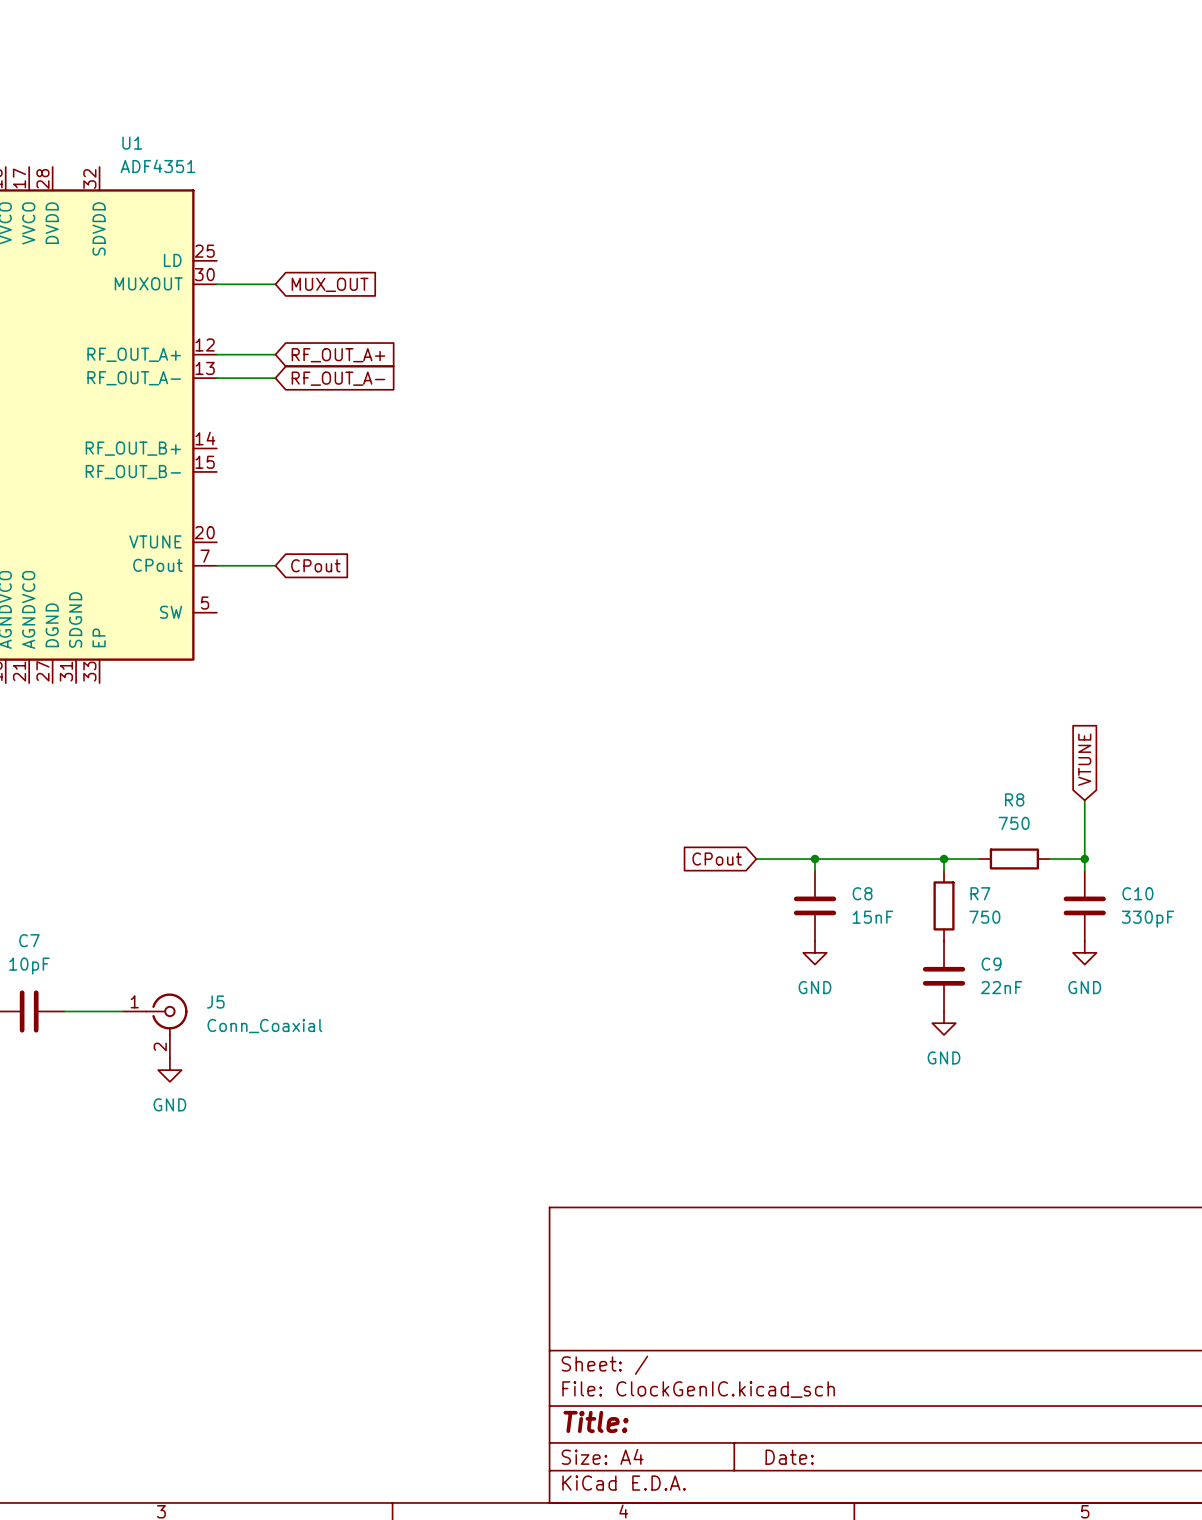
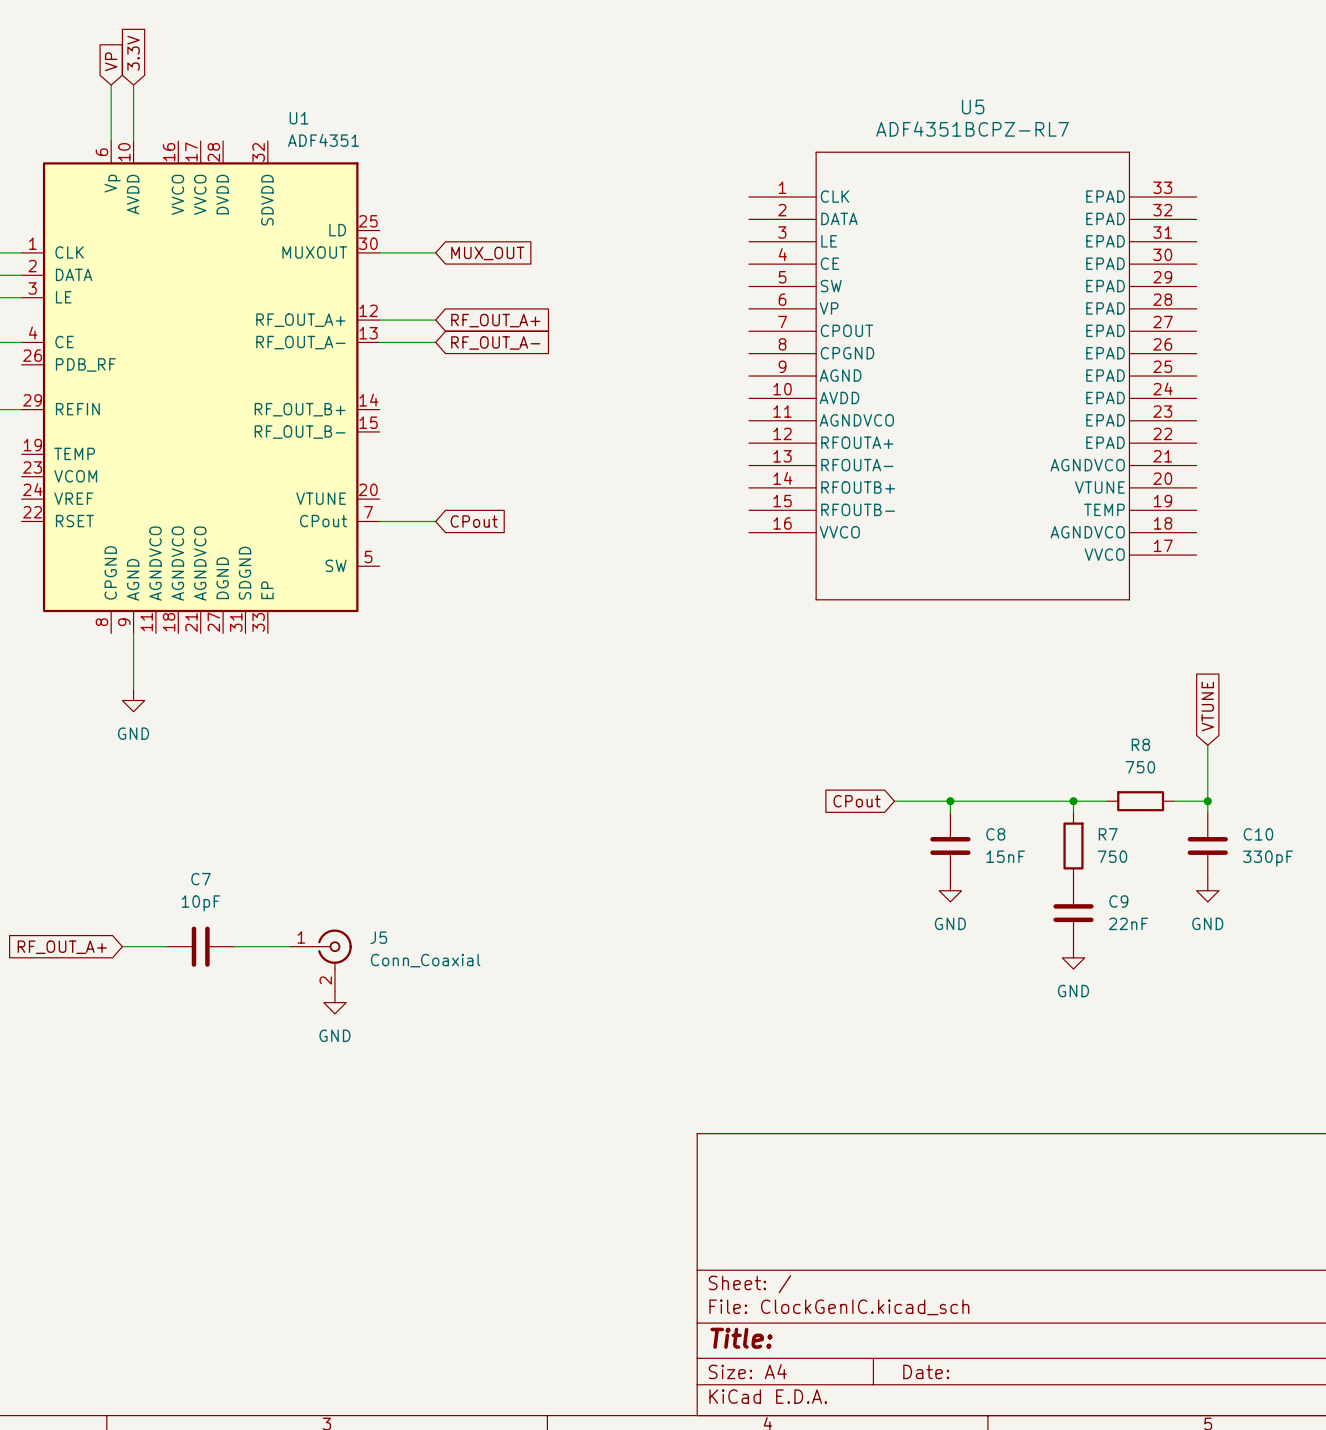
U5: none -> ADF4351BCPZ-RL7 (972, 376)

